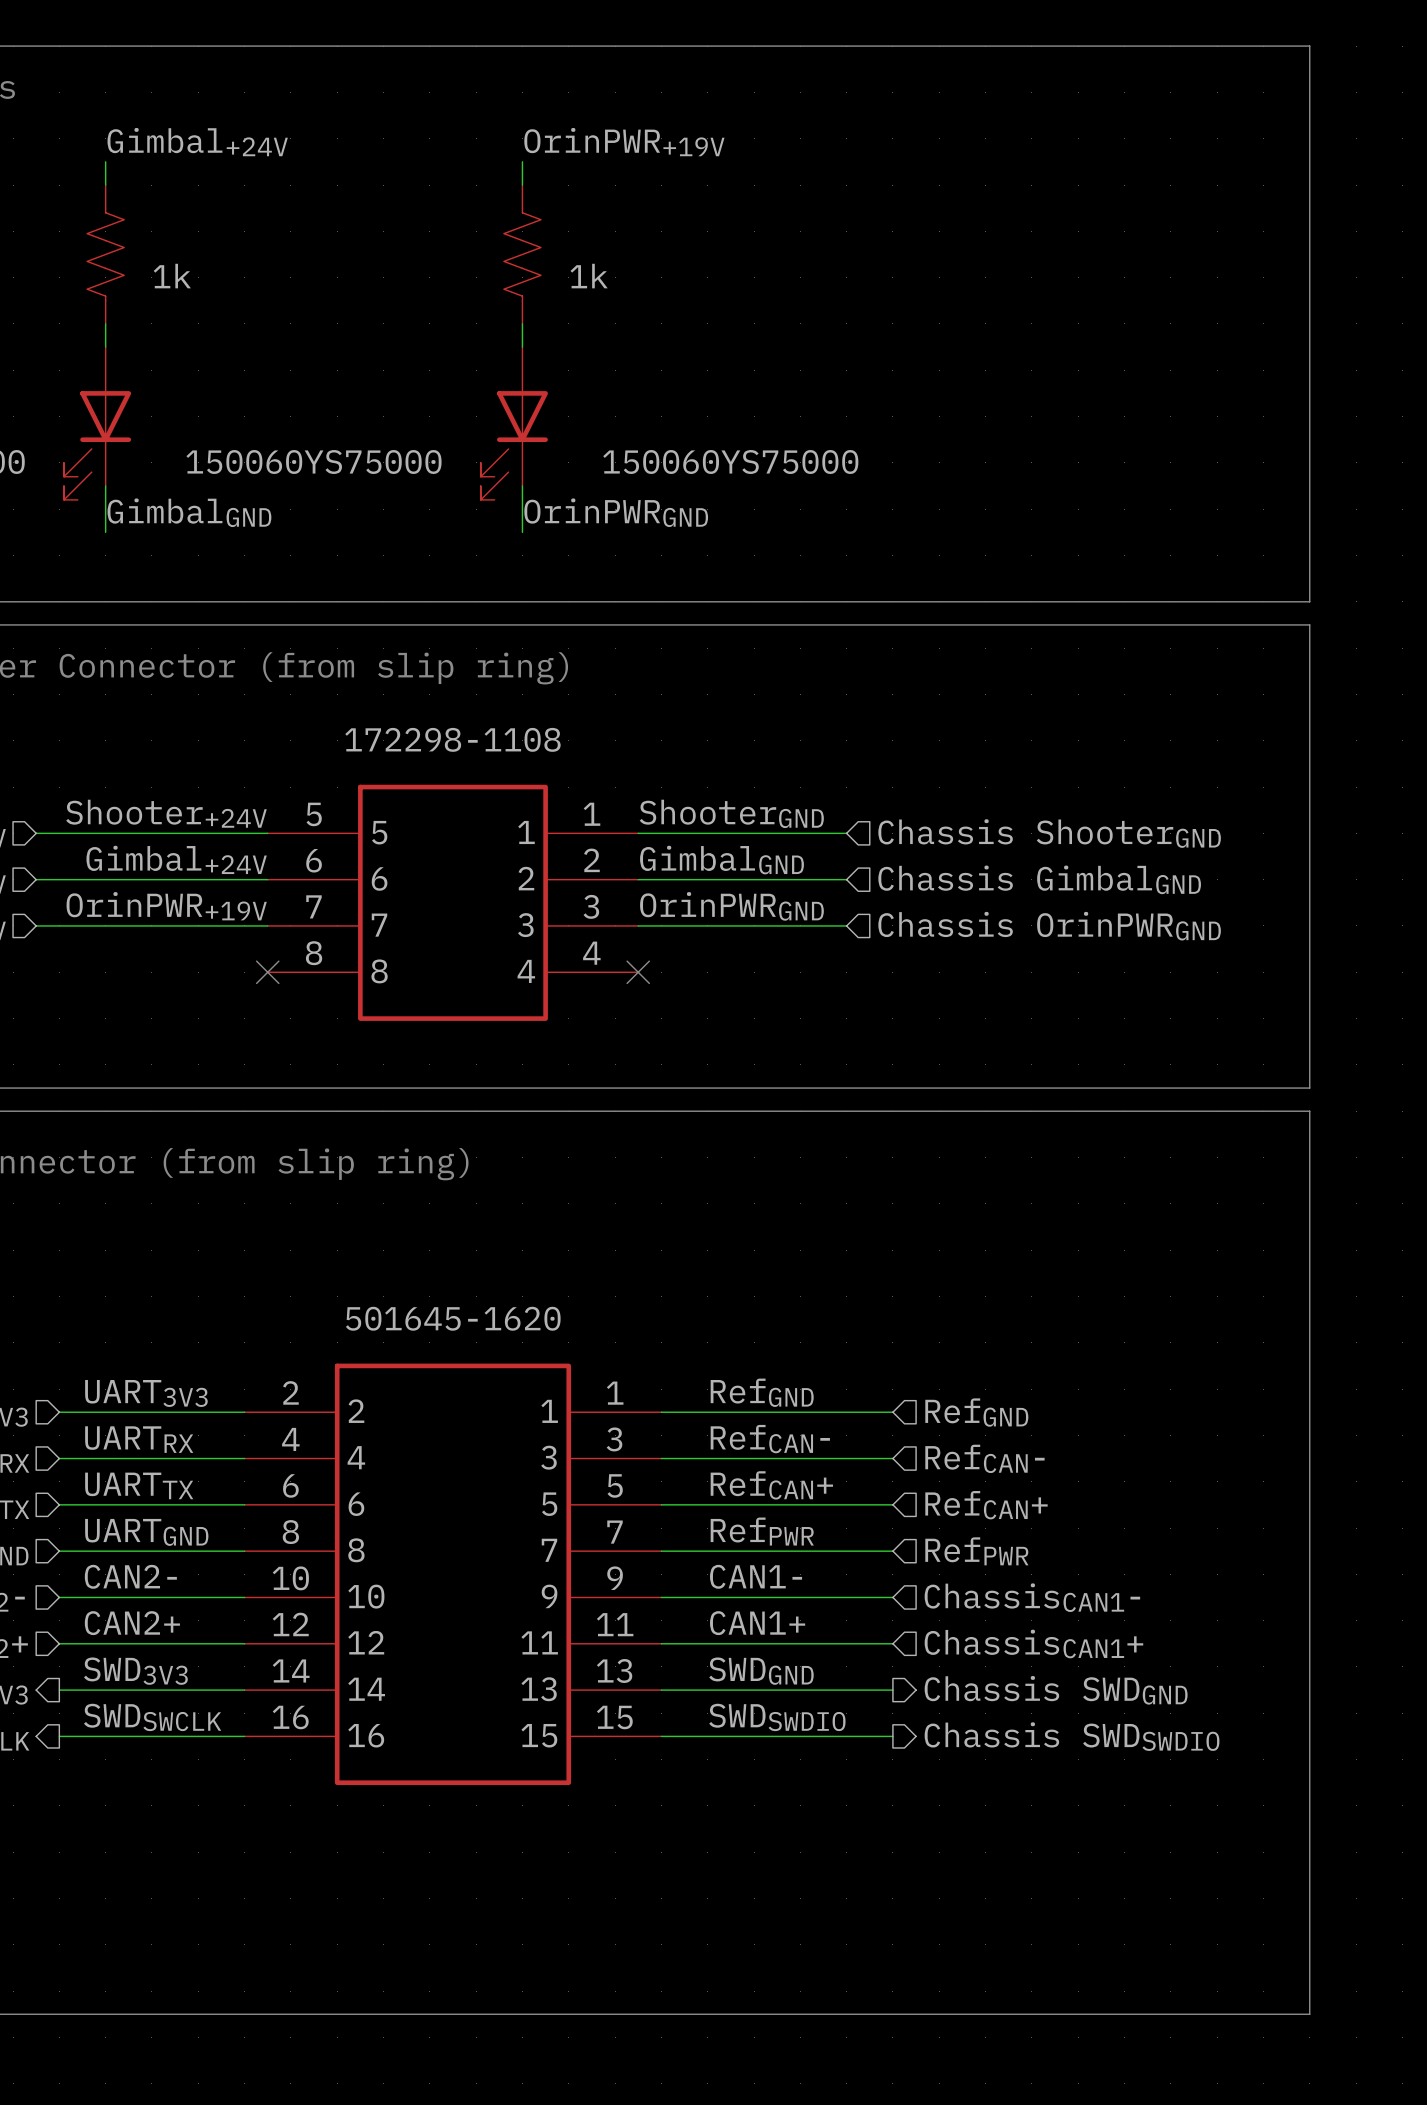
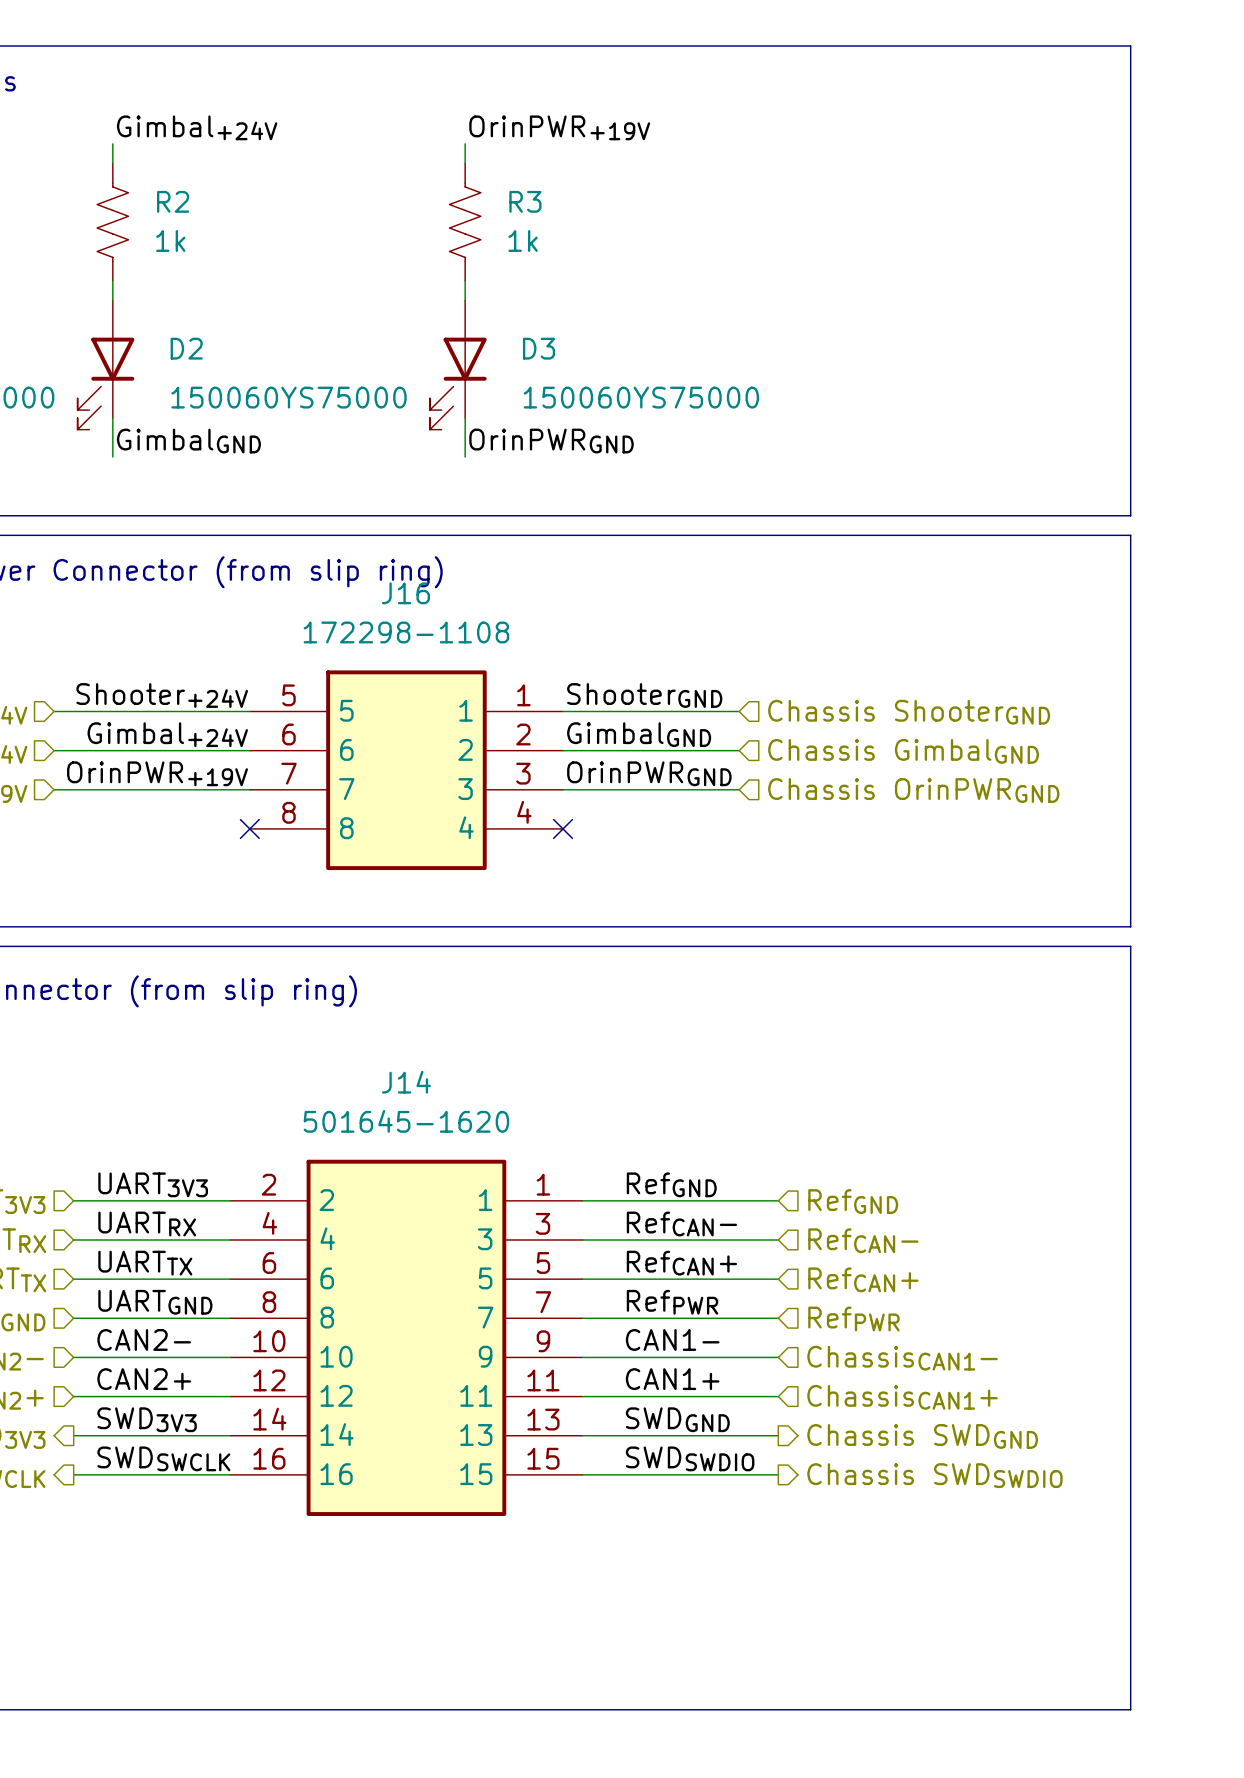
R2 name: none -> R2 (173, 201)
R3 name: none -> R3 (525, 201)
D2 name: none -> D2 (186, 348)
D3 name: none -> D3 (539, 348)
J16 name: none -> J16 (405, 593)
J14 name: none -> J14 (406, 1082)

